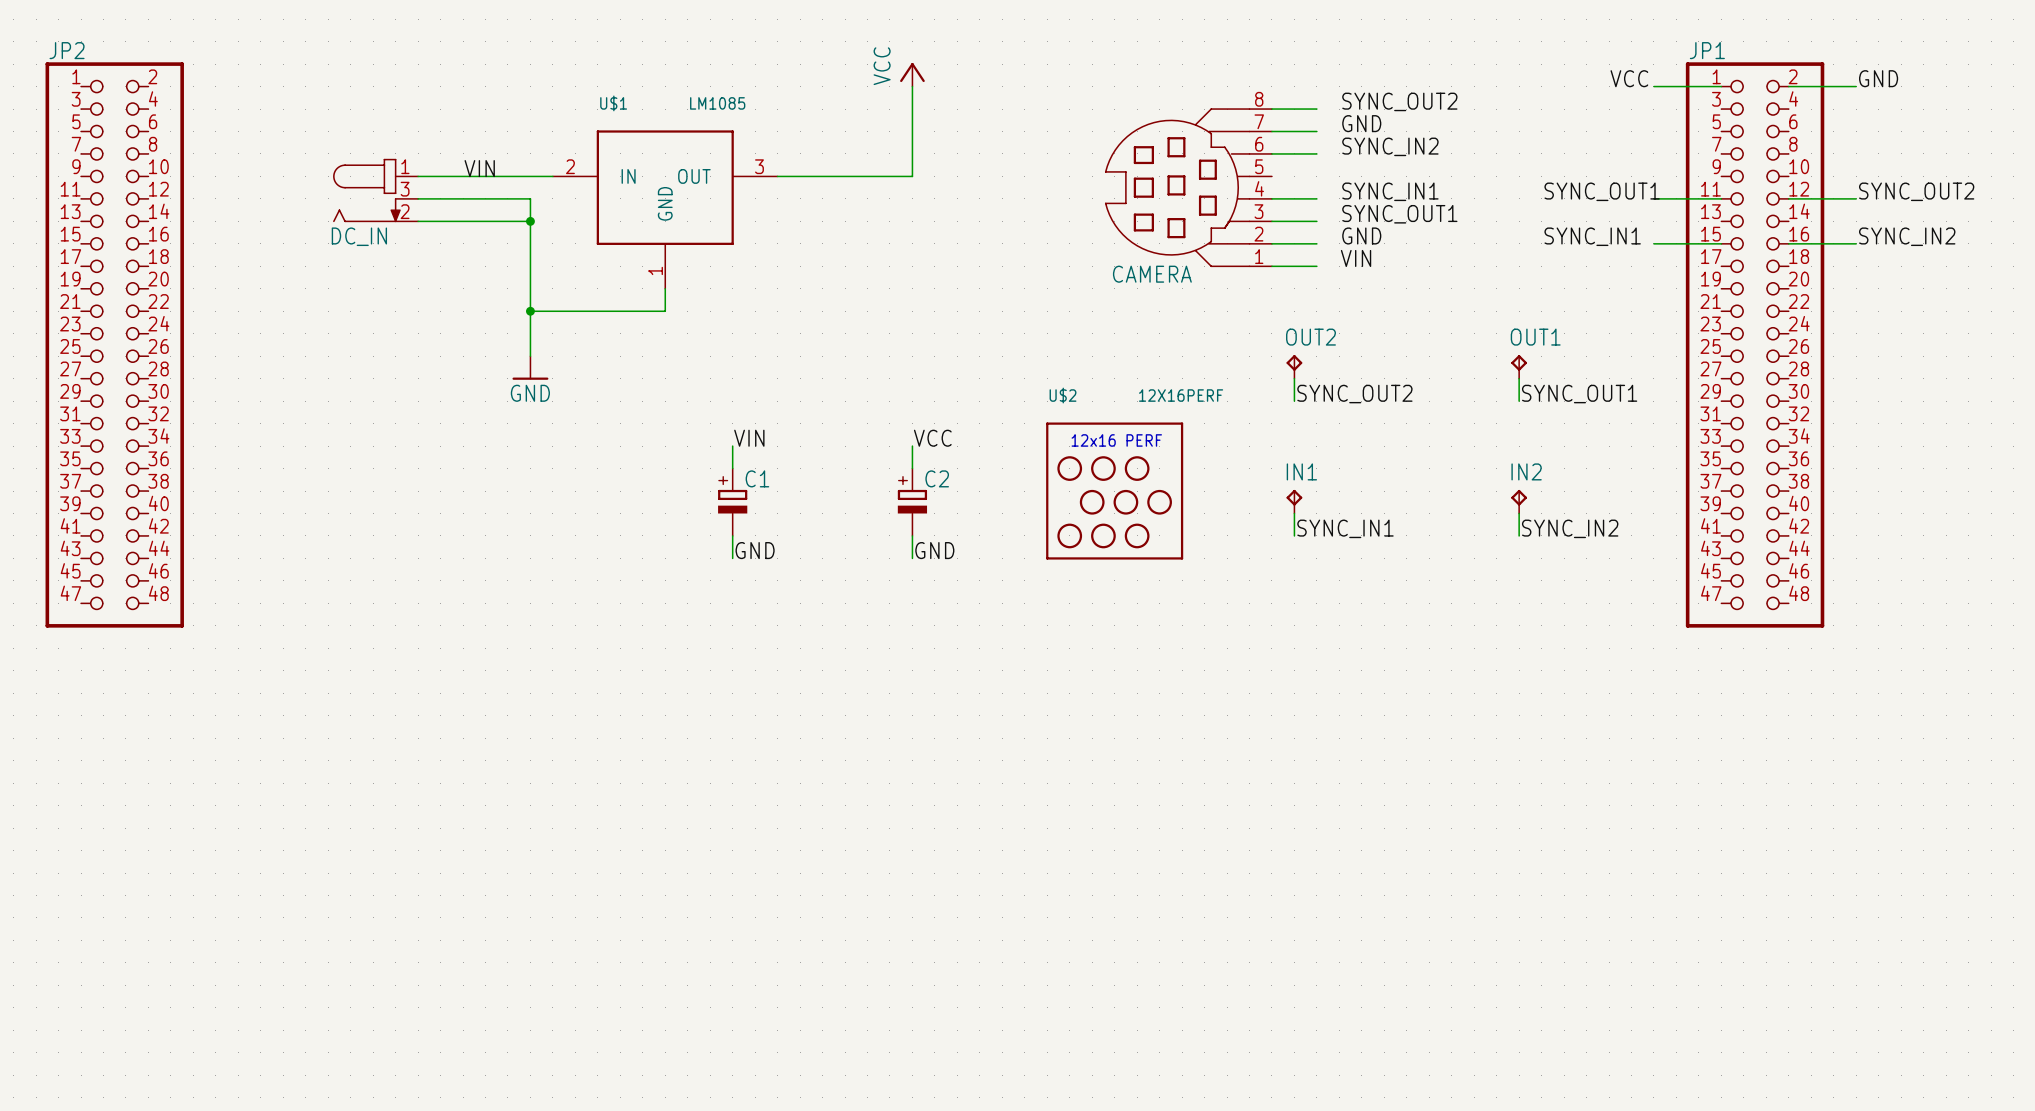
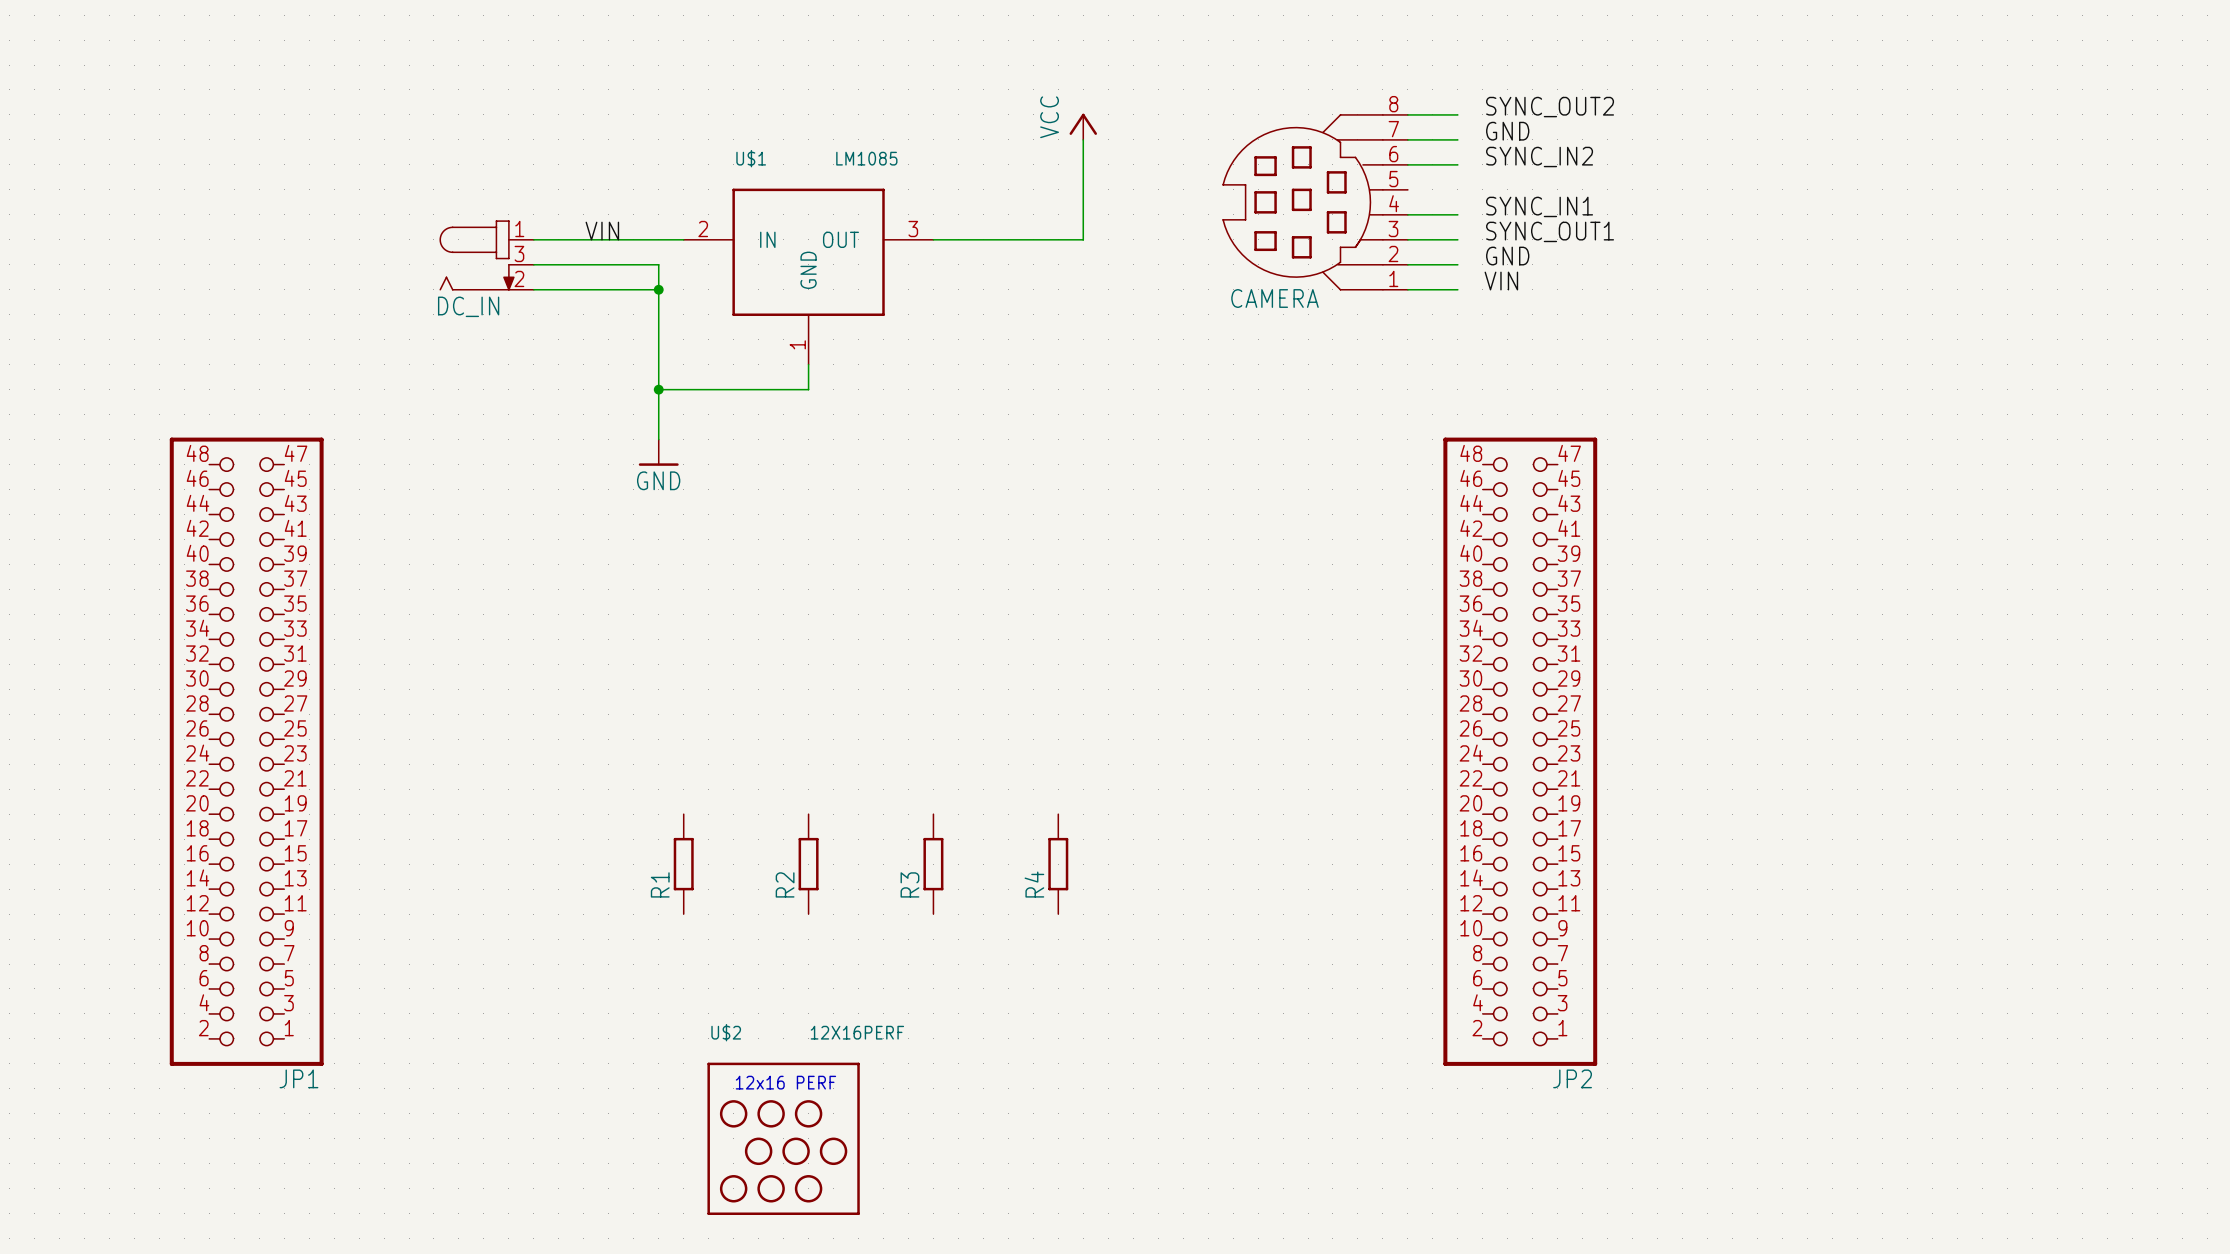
power symbol position: VCC (912, 74) -> VCC (1083, 126)
label: VCC (1629, 78) -> none
label: GND (1878, 78) -> none
wire: (912, 86) (912, 176) (777, 176) -> (1083, 139) (1083, 239) (933, 239)
wire: (1653, 86) (1721, 86) -> none
wire: (1788, 86) (1856, 86) -> none
label position: VIN (479, 168) -> VIN (602, 231)
wire: (418, 176) (552, 176) -> none
DC_IN position: (375, 190) -> (486, 255)
label: SYNC_OUT1 (1602, 191) -> none
label: SYNC_OUT2 (1916, 191) -> none
wire: (418, 198) (530, 198) (530, 356) -> (533, 264) (658, 264) (658, 439)
wire: (1653, 198) (1721, 198) -> none
wire: (1788, 198) (1856, 198) -> none
U$1 position: (665, 209) -> (808, 276)
wire: (418, 221) (485, 221) -> none
wire: none -> (583, 239) (683, 239)
junction: (530, 221) -> none
label: SYNC_IN1 (1592, 236) -> none
label: SYNC_IN2 (1907, 236) -> none
wire: (1653, 243) (1721, 243) -> none
wire: (1788, 243) (1856, 243) -> none
wire: none -> (533, 289) (658, 289)
junction: none -> (658, 289)
wire: (665, 288) (665, 311) (530, 311) -> (808, 364) (808, 389) (658, 389)
junction: (530, 311) -> none
JP2 rotation: 0° (114, 344) -> 180° (1520, 751)
JP2 position: (114, 344) -> (1520, 751)
JP1 rotation: 0° (1755, 344) -> 180° (246, 751)
JP1 position: (1755, 344) -> (246, 751)
junction: none -> (658, 389)
OUT2: (1294, 366) -> none
OUT1: (1519, 366) -> none
power symbol position: GND (530, 368) -> GND (658, 452)
wire: (1294, 378) (1294, 401) -> none
wire: (1519, 378) (1519, 401) -> none
label: SYNC_OUT2 (1354, 394) -> none
label: SYNC_OUT1 (1579, 394) -> none
label: VIN (749, 438) -> none
label: VCC (932, 438) -> none
wire: (732, 446) (732, 468) -> none
wire: (912, 446) (912, 468) -> none
U$2 position: (1114, 491) -> (783, 1138)
IN1: (1294, 501) -> none
IN2: (1519, 501) -> none
C1: (732, 502) -> none
C2: (912, 502) -> none
wire: (1294, 513) (1294, 535) -> none
wire: (1519, 513) (1519, 535) -> none
label: SYNC_IN1 (1345, 528) -> none
label: SYNC_IN2 (1570, 528) -> none
wire: (732, 535) (732, 558) -> none
wire: (912, 535) (912, 558) -> none
label: GND (755, 550) -> none
label: GND (934, 550) -> none
R1: none -> (683, 864)
R2: none -> (808, 864)
R3: none -> (933, 864)
R4: none -> (1058, 864)

